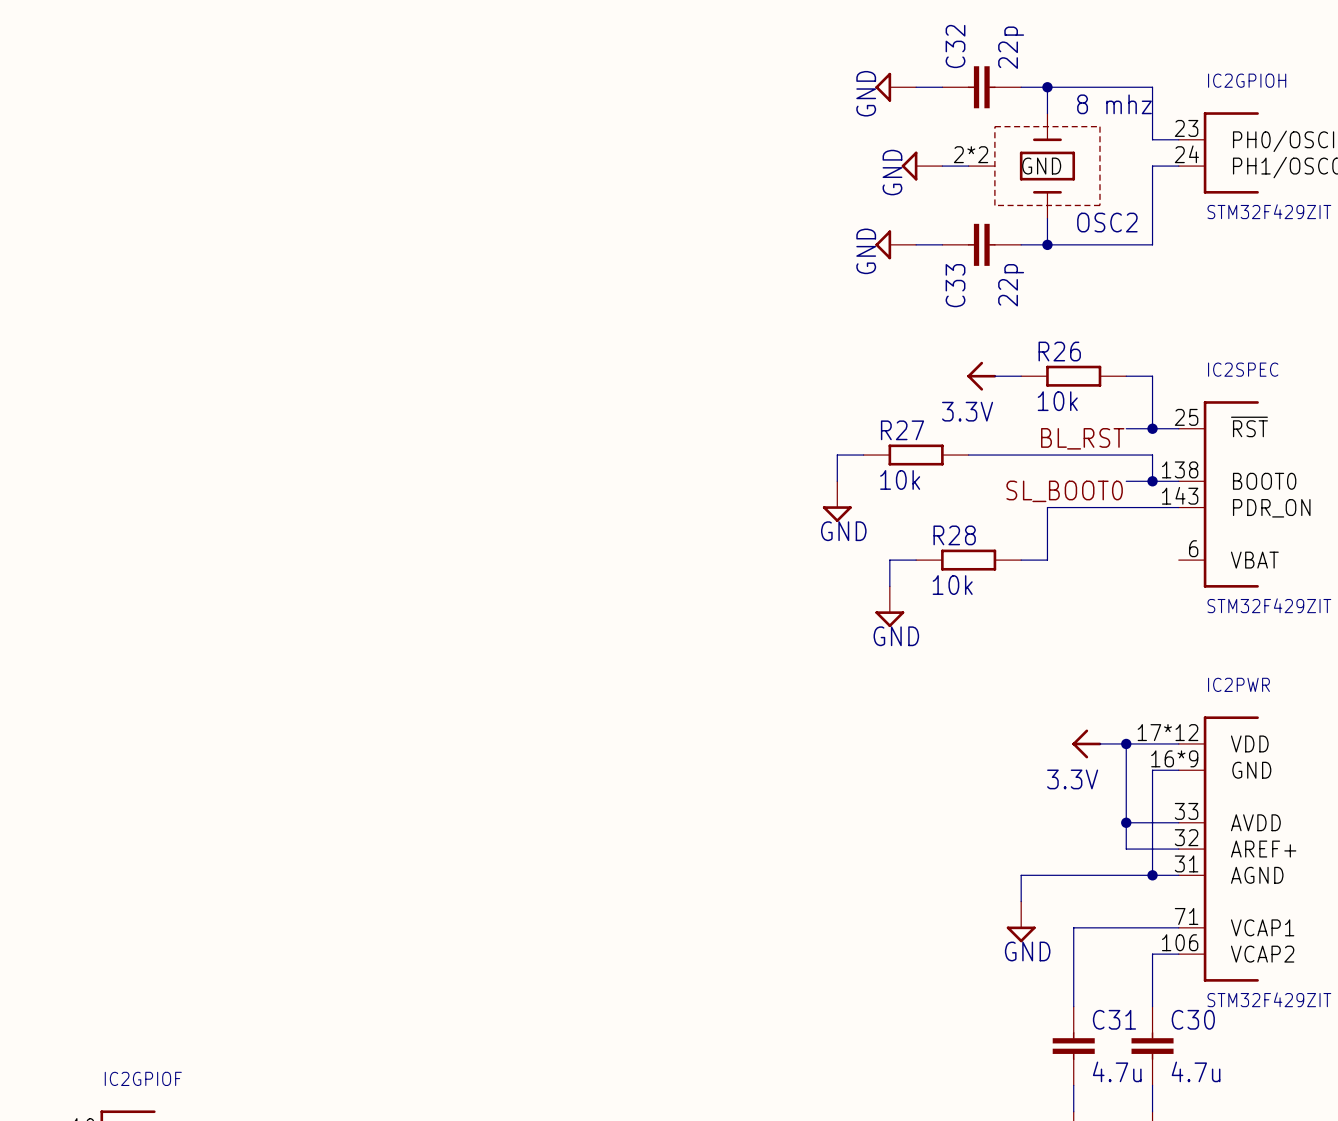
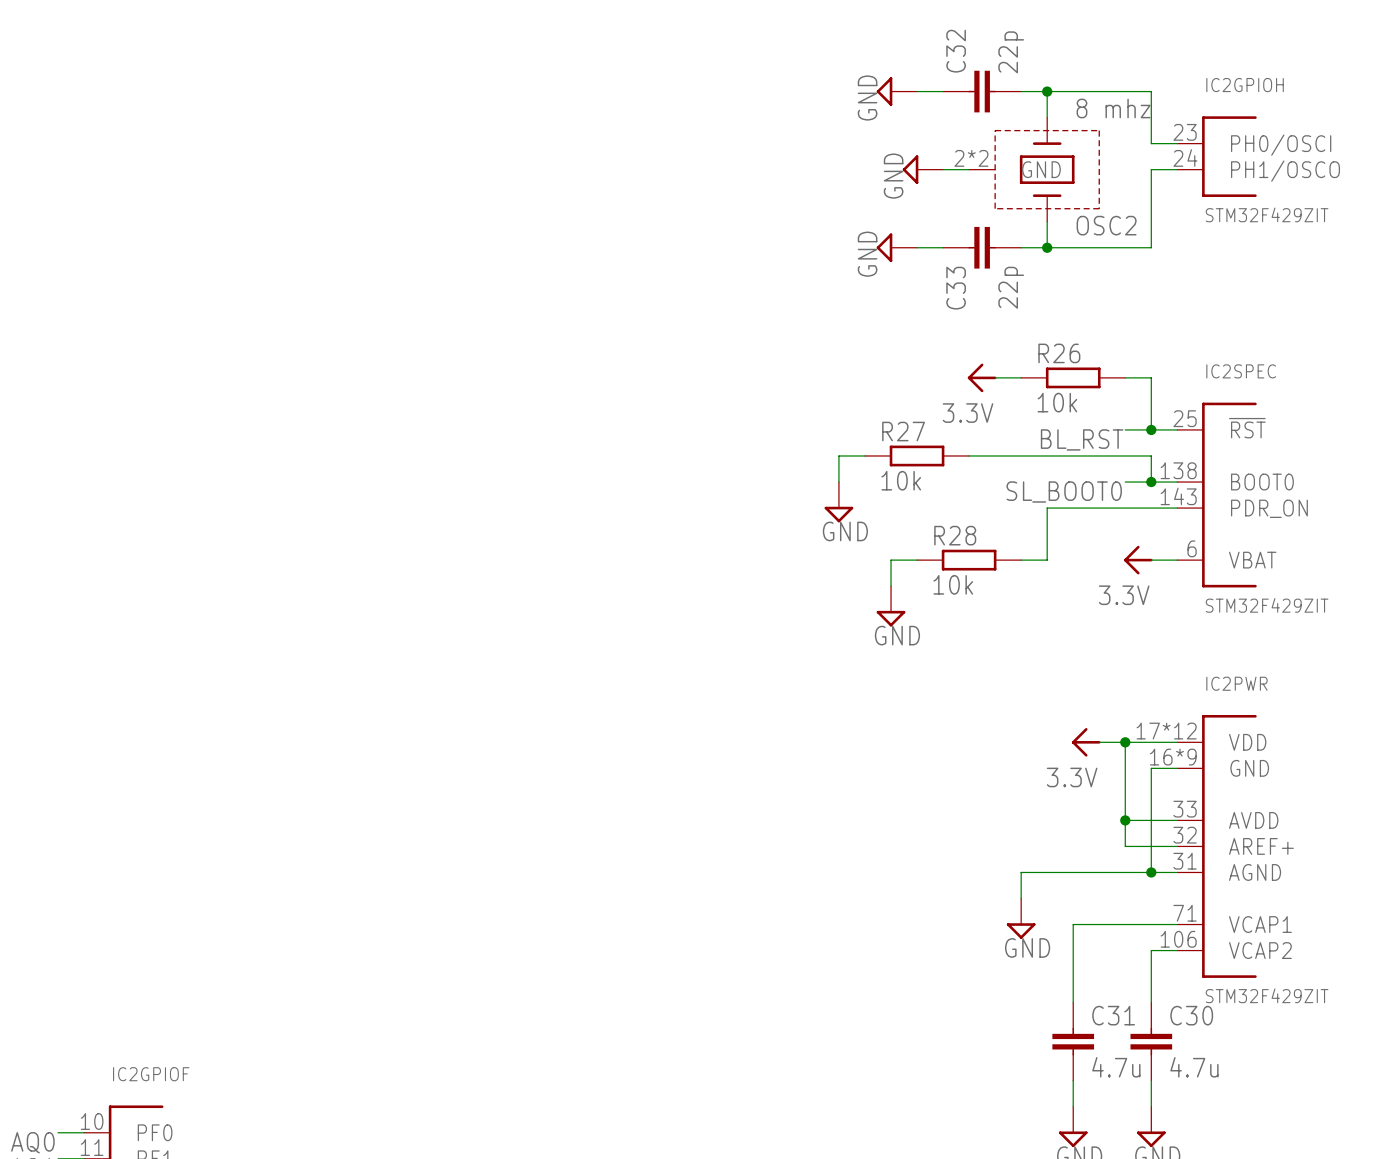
power symbol: none -> 3.3V (1138, 560)
wire: none -> (1151, 560) (1177, 560)

